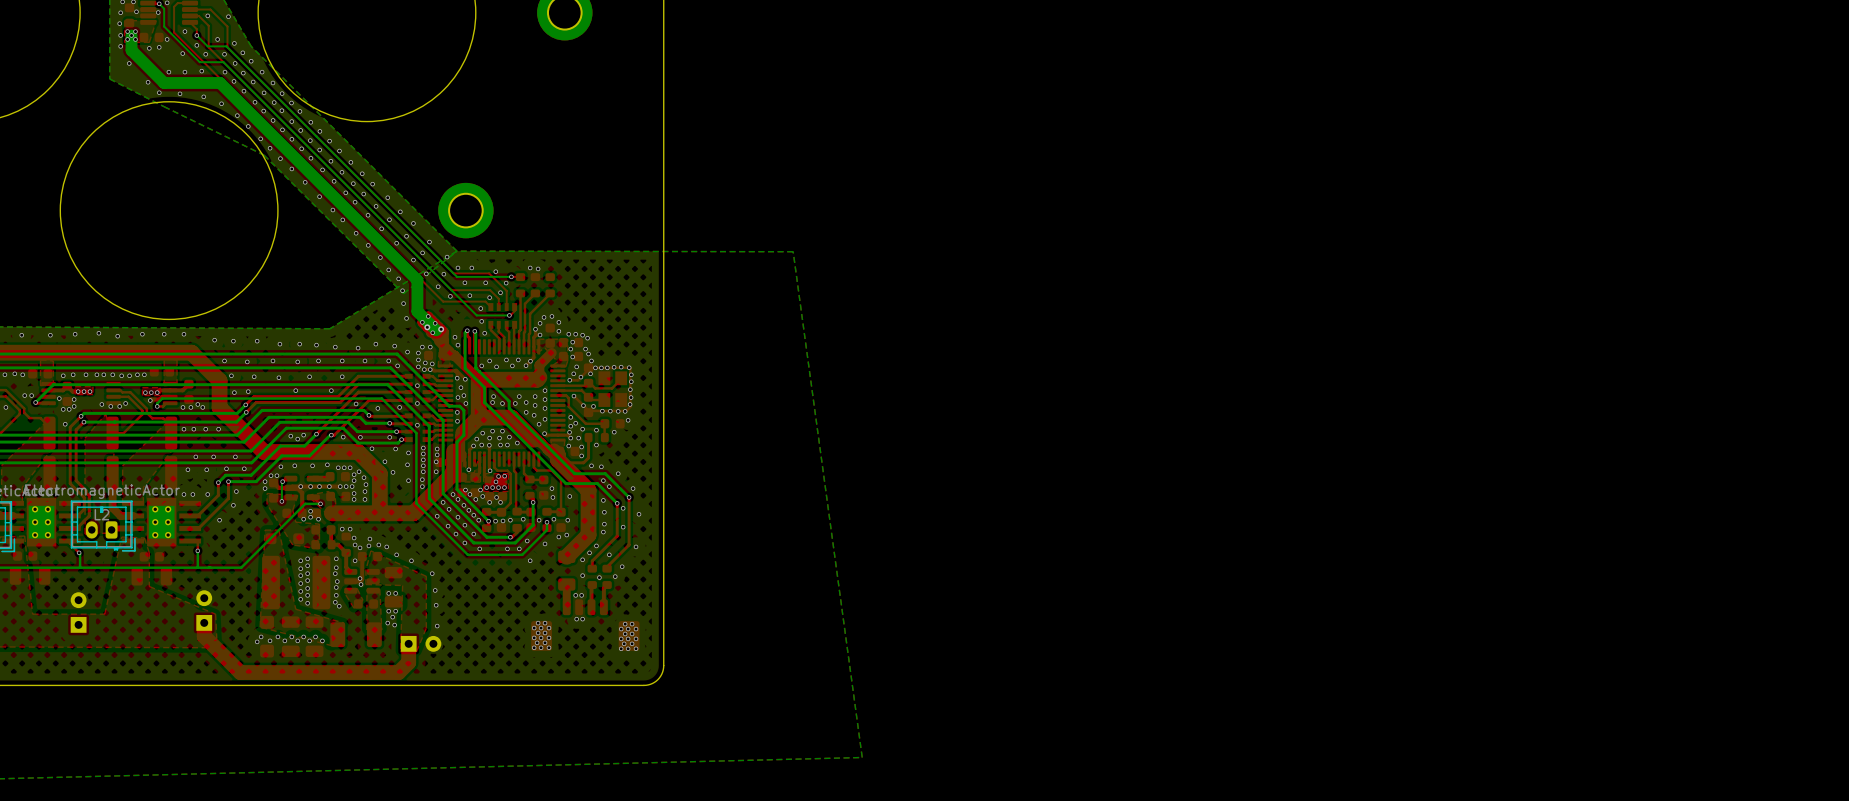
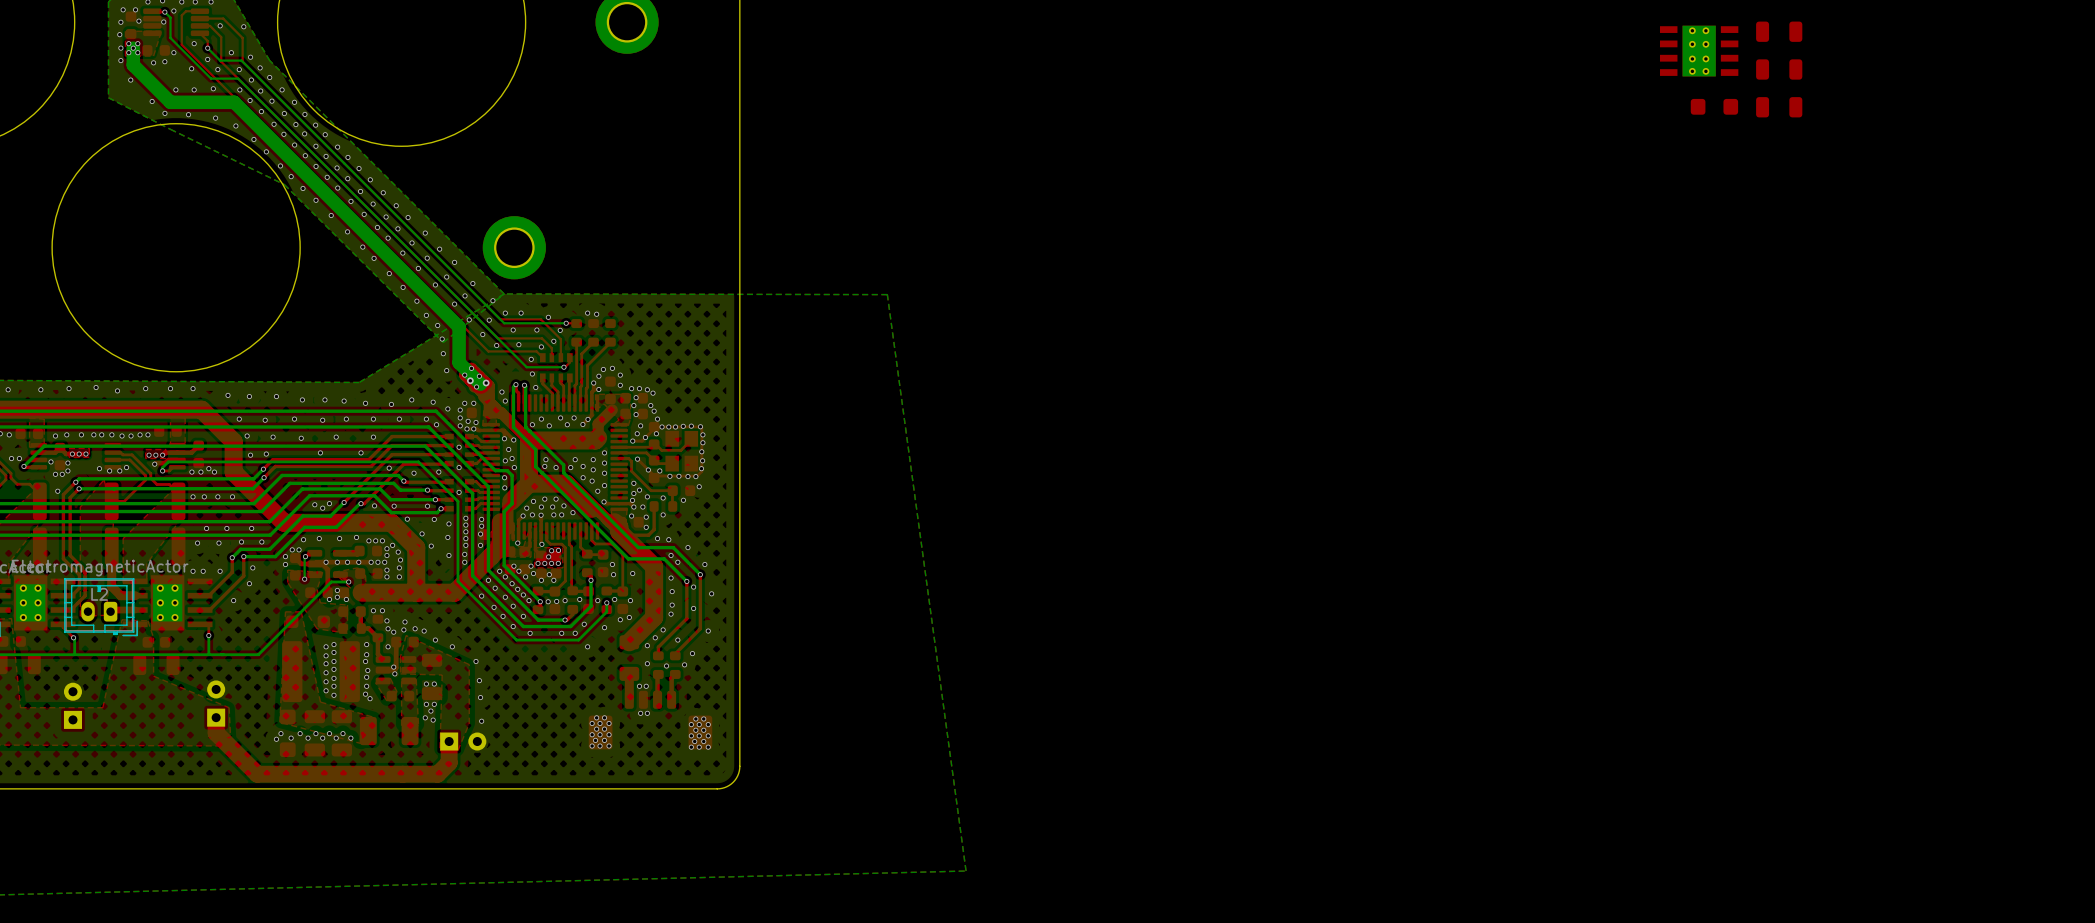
part: none -> (1779, 31)
part: none -> (1699, 51)
part: none -> (1779, 69)
part: none -> (1714, 106)
part: none -> (1779, 107)

